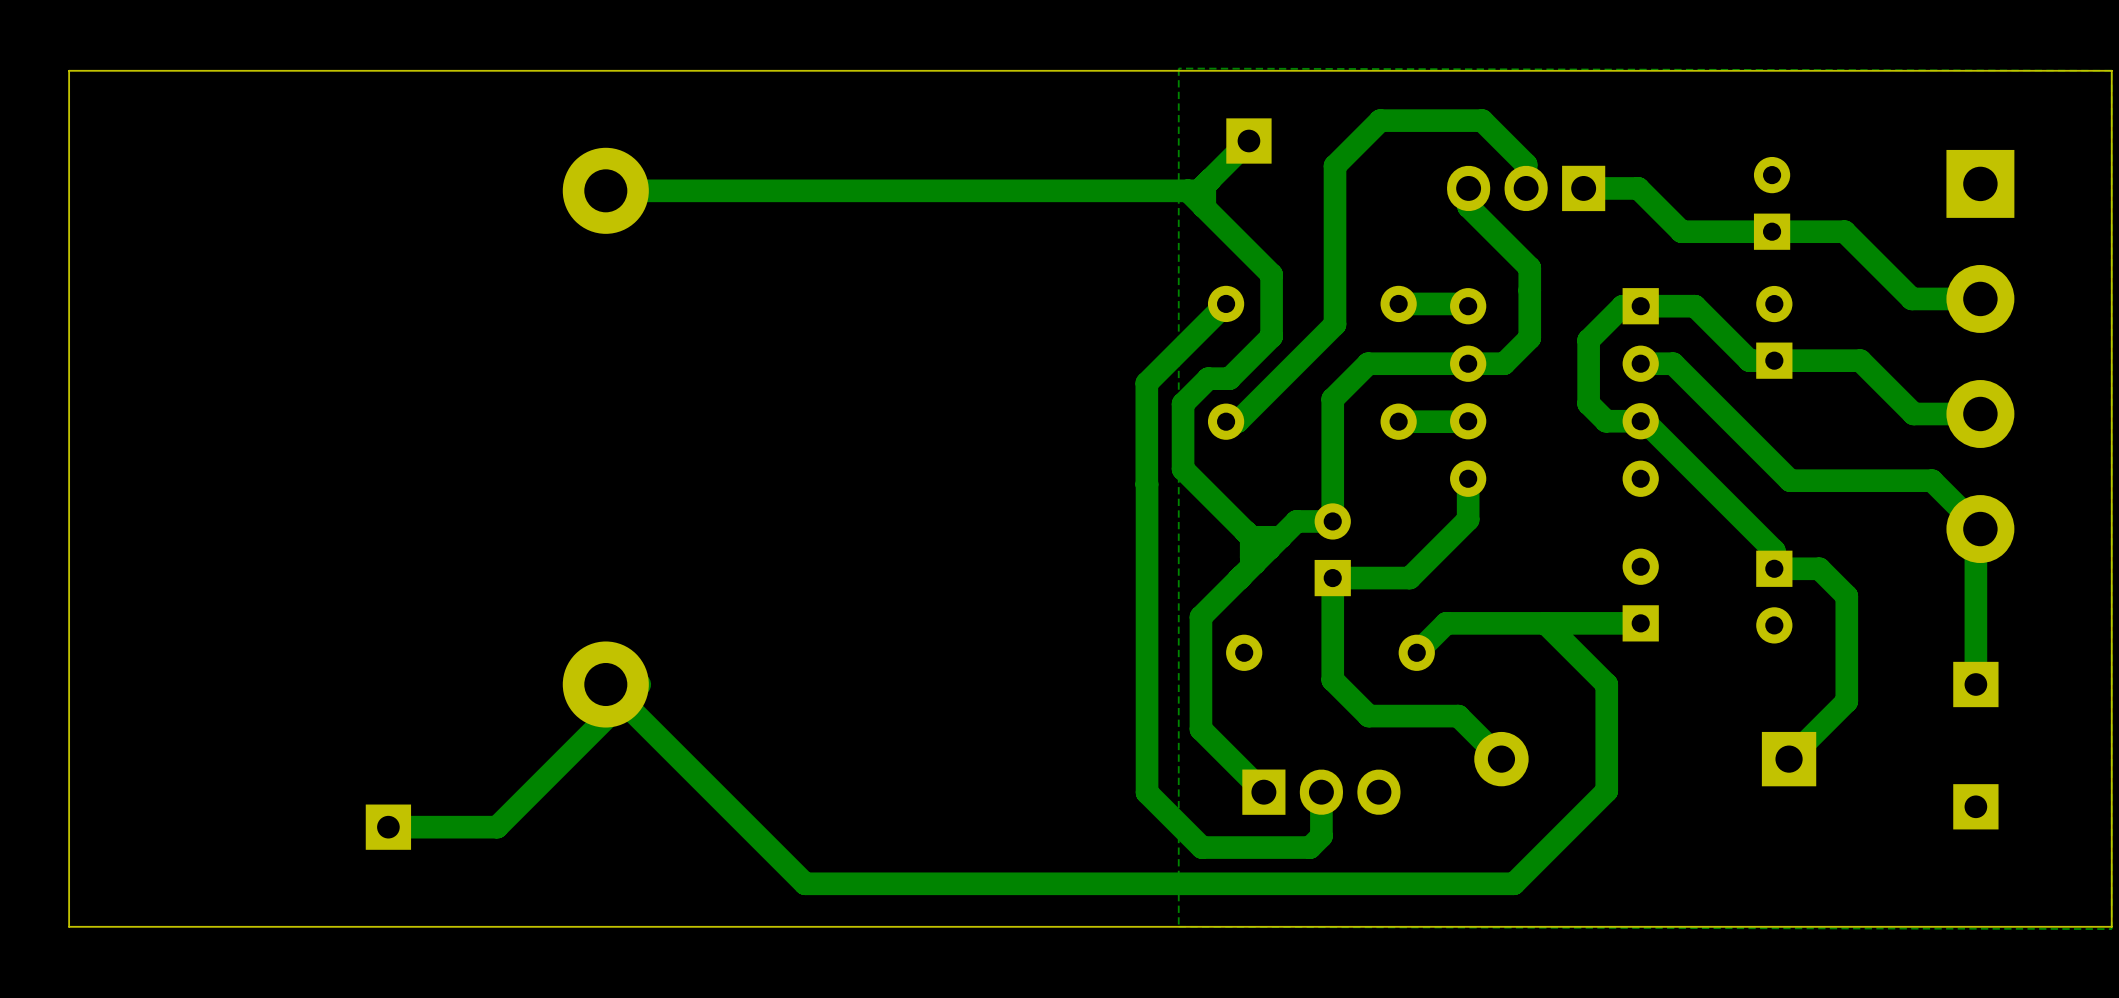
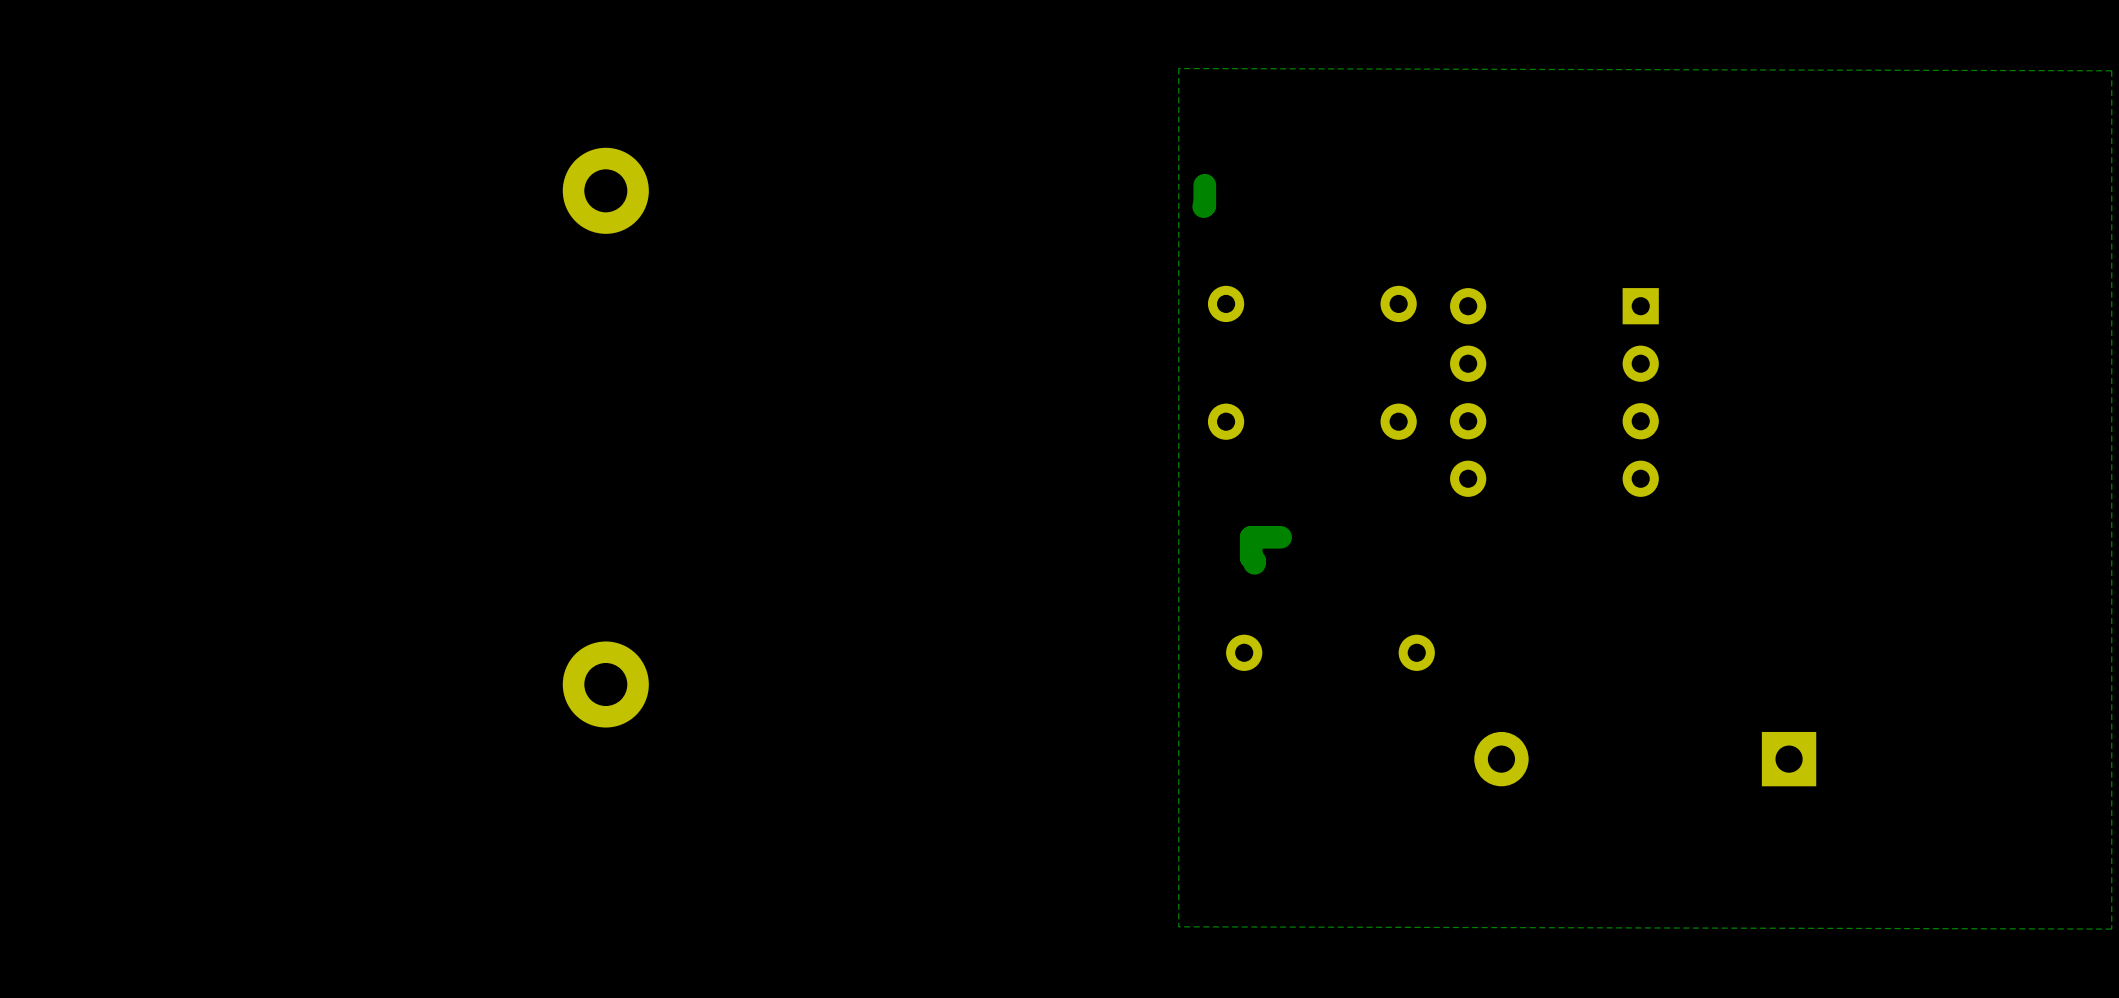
board edge: (2111, 70) (69, 70) (69, 926) (2111, 926) (2111, 70) -> none
track: (1248, 141) (1199, 190) (605, 190) -> none
part: (1248, 141) -> none
track: (1468, 188) (1468, 206) (1529, 267) (1529, 338) (1504, 363) (1368, 363) (1332, 399) (1332, 521) (1296, 521) (1200, 617) (1200, 729) (1263, 792) -> none
track: (1526, 188) (1526, 164) (1482, 120) (1380, 120) (1335, 165) (1335, 324) (1237, 421) (1226, 421) -> none
part: (1526, 188) -> none
track: (1583, 188) (1638, 188) (1681, 231) (1844, 231) (1911, 298) (1980, 298) -> none
track: (1187, 190) (1271, 274) (1271, 336) (1229, 378) (1208, 378) (1183, 403) (1183, 469) (1262, 548) (1269, 548) -> none
part: (1772, 203) -> none
track: (1226, 303) (1146, 383) (1146, 484) -> none
track: (1398, 303) (1465, 303) (1468, 306) -> none
part: (1774, 332) -> none
part: (1980, 356) -> none
track: (1640, 363) (1673, 363) (1790, 480) (1932, 480) (1980, 529) (1975, 533) (1975, 684) -> none
track: (1980, 413) (1913, 413) (1860, 360) (1749, 360) (1694, 306) (1622, 306) (1588, 340) (1588, 403) (1606, 421) (1644, 421) (1774, 550) (1774, 568) (1819, 568) (1846, 596) (1846, 701) (1789, 759) -> none
track: (1468, 421) (1398, 421) -> none
track: (1468, 478) (1468, 519) (1409, 578) (1332, 578) (1332, 679) (1368, 716) (1458, 716) (1501, 759) -> none
track: (1147, 484) (1147, 792) (1201, 847) (1310, 847) (1321, 836) (1321, 792) -> none
part: (1332, 549) -> none
part: (1640, 595) -> none
part: (1774, 597) -> none
track: (1545, 623) (1606, 684) (1606, 790) (1513, 883) (805, 883) (605, 684) -> none
track: (1640, 623) (1446, 623) (1416, 652) -> none
track: (639, 684) (497, 827) (388, 827) -> none
part: (1975, 684) -> none
part: (1321, 792) -> none
part: (1975, 806) -> none
part: (388, 827) -> none

